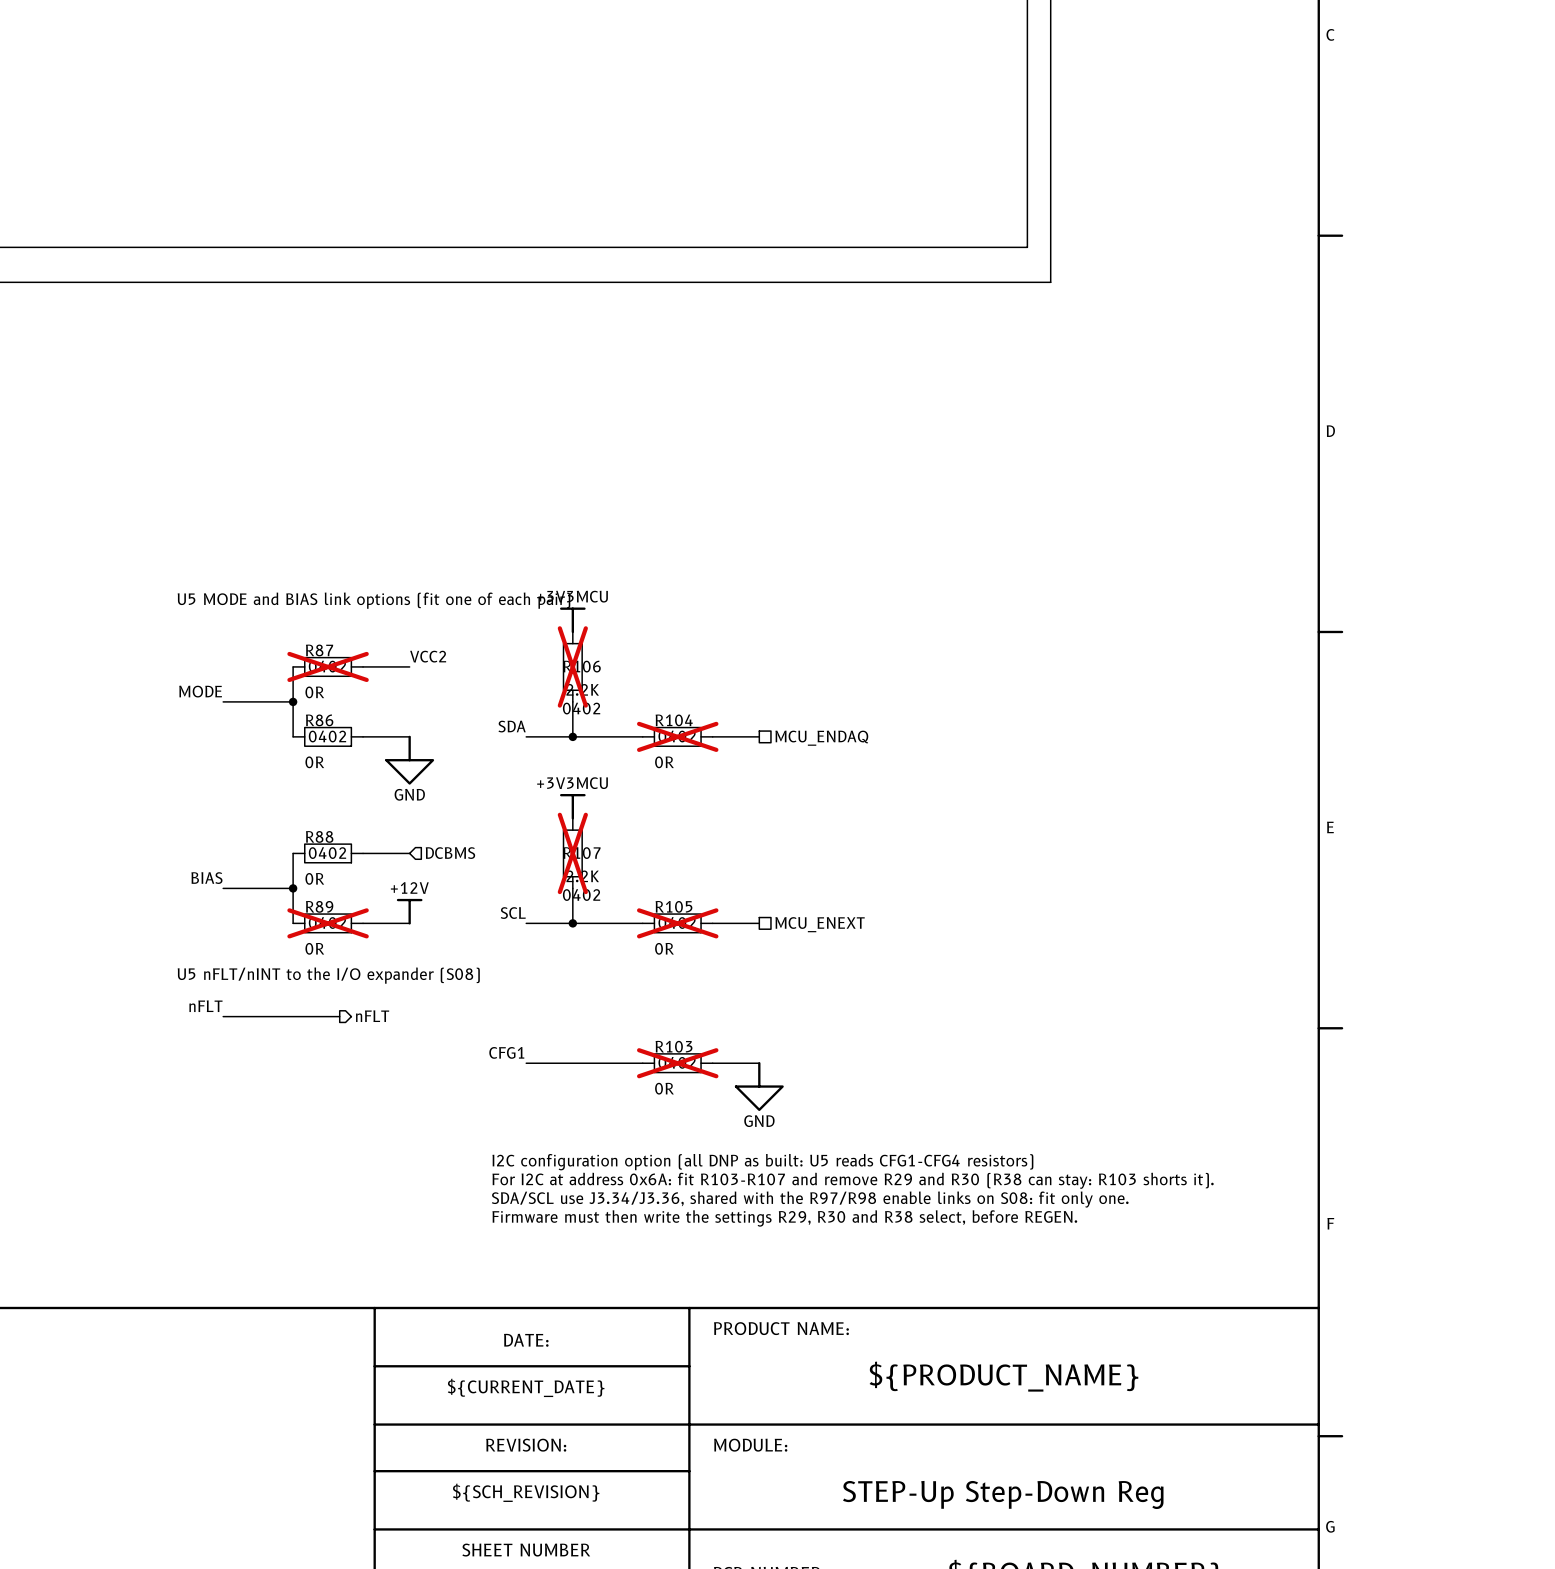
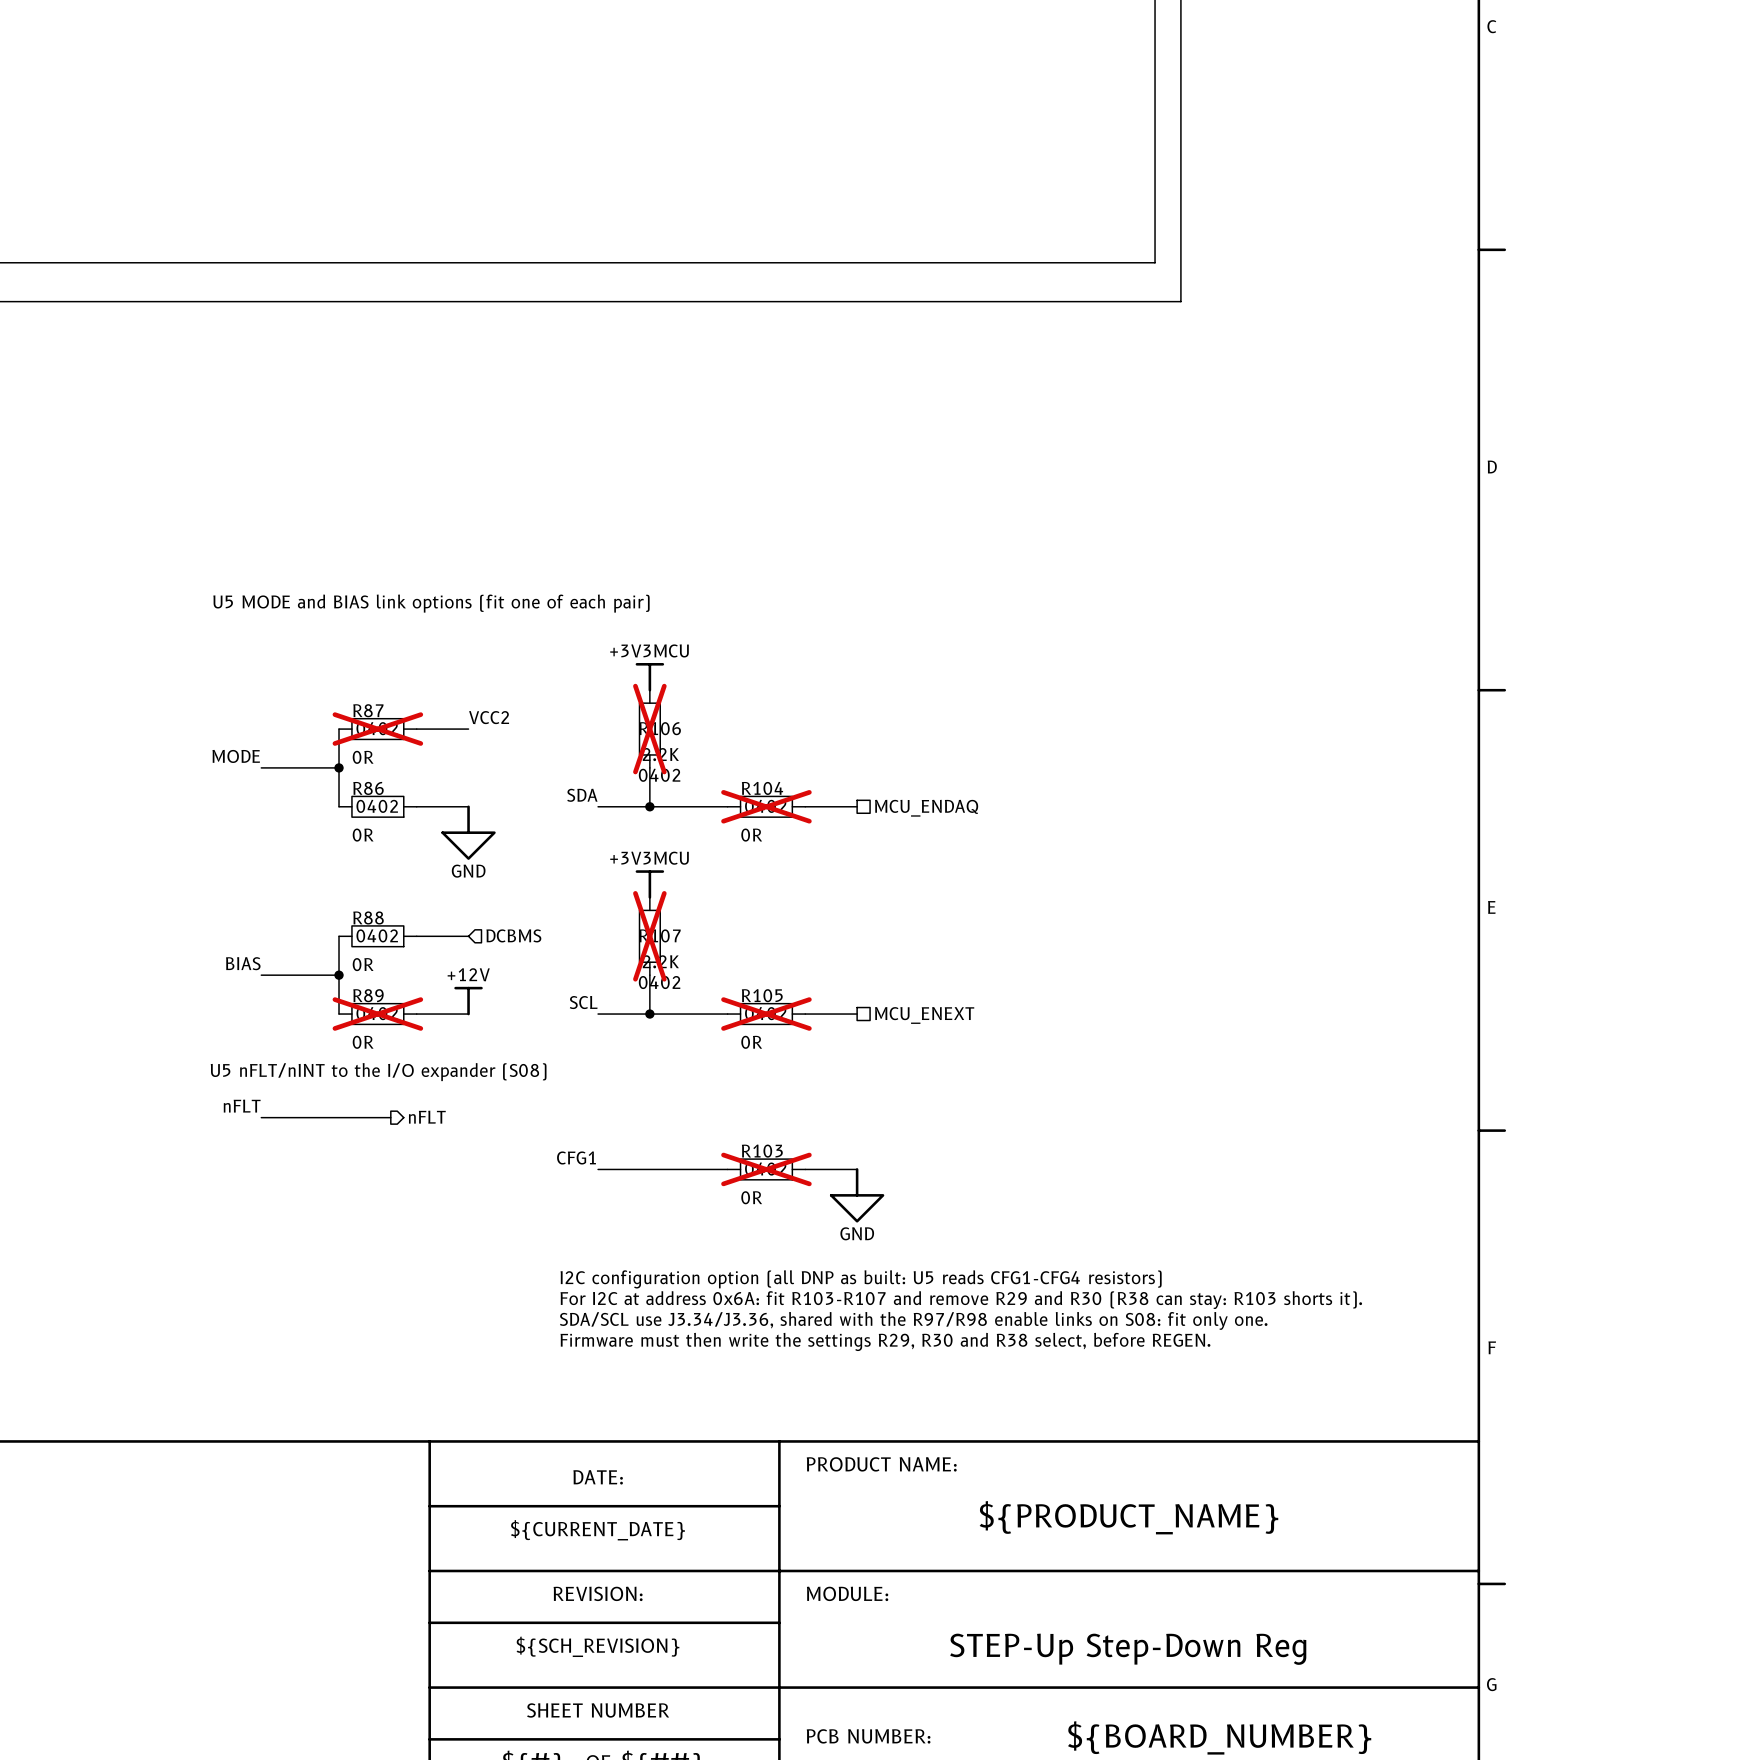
text position: U5 MODE and BIAS link options (fit one of each pair) (373, 600) -> U5 MODE and BIAS link options (fit one of each pair) (431, 603)

